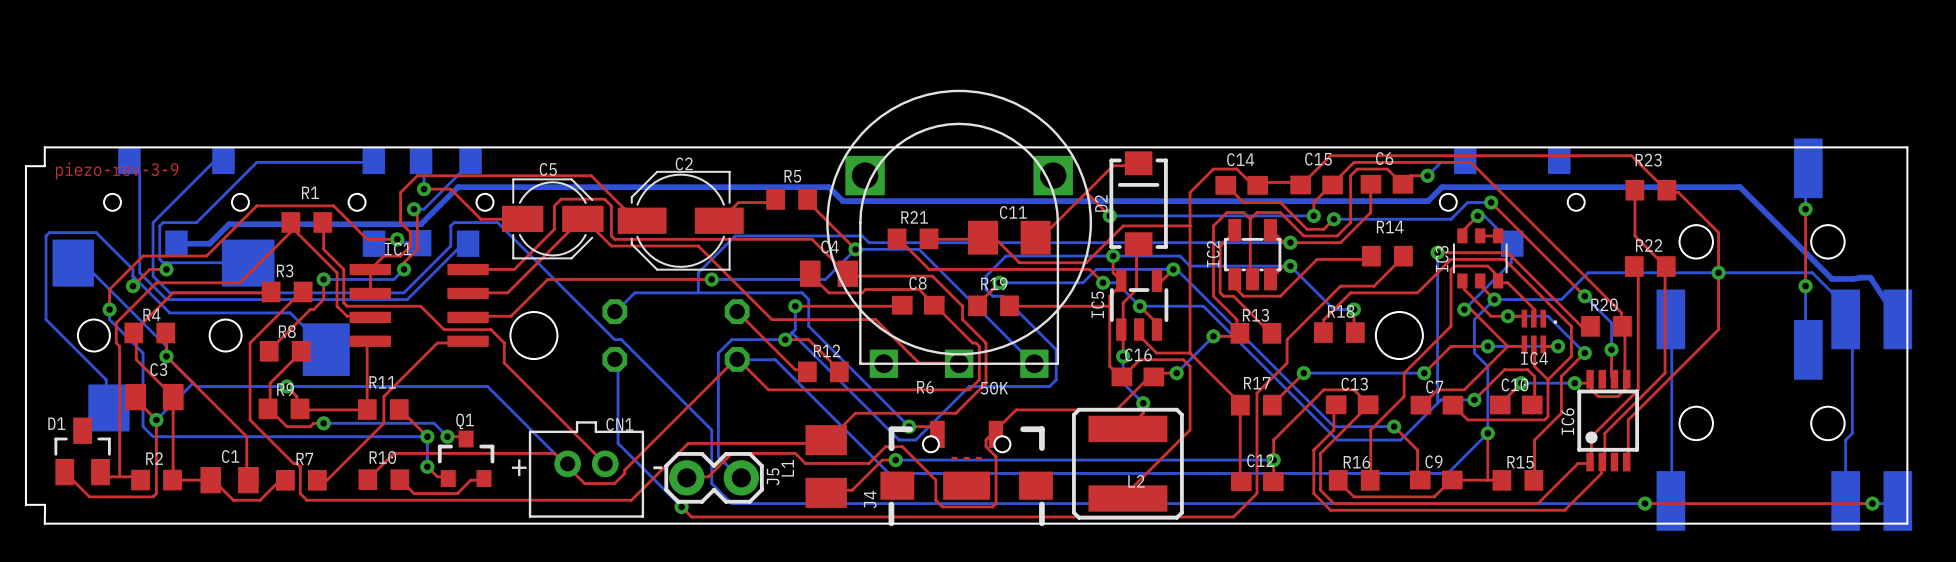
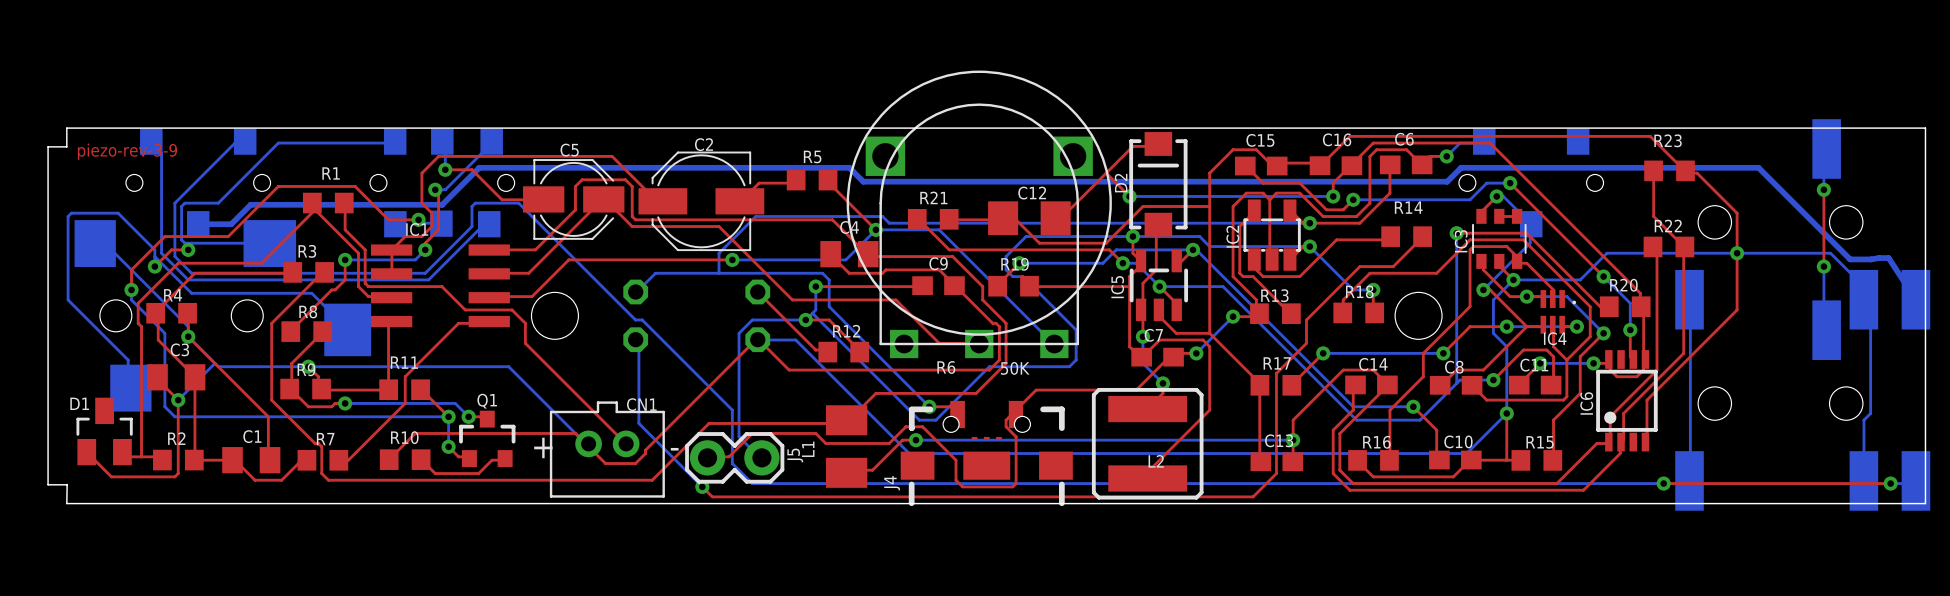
C14 name: C14 (1240, 159) -> C15 (1260, 140)
C15 name: C15 (1318, 159) -> C16 (1337, 139)
C11 name: C11 (1013, 212) -> C12 (1032, 193)
C8 name: C8 (917, 283) -> C9 (938, 263)
C16 name: C16 (1138, 354) -> C7 (1153, 335)
C13 name: C13 (1354, 384) -> C14 (1373, 364)
C10 name: C10 (1515, 384) -> C11 (1534, 365)
C7 name: C7 (1434, 386) -> C8 (1454, 367)
C12 name: C12 (1260, 460) -> C13 (1279, 440)
C9 name: C9 (1433, 461) -> C10 (1458, 441)

